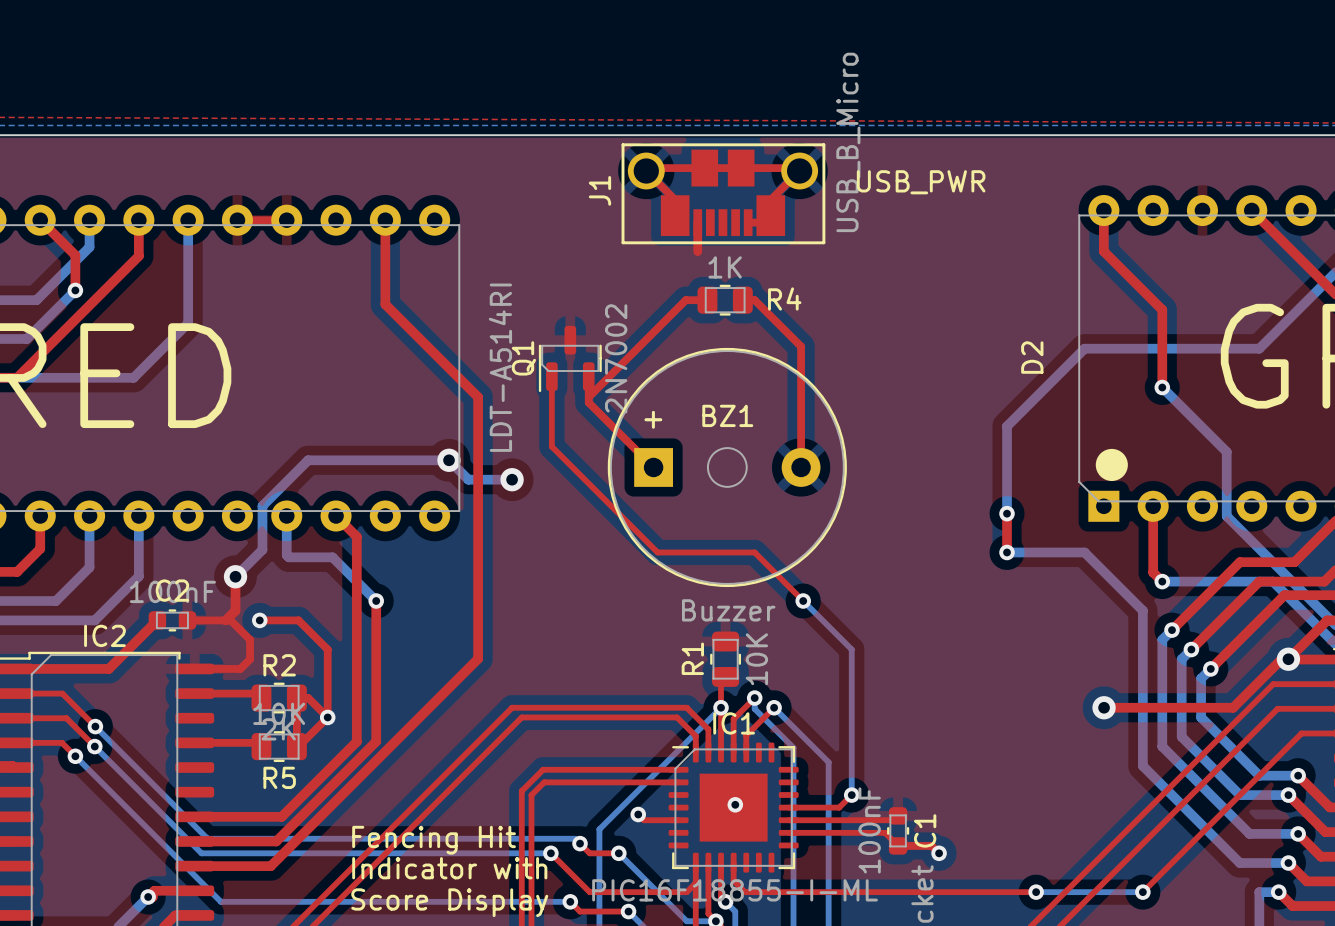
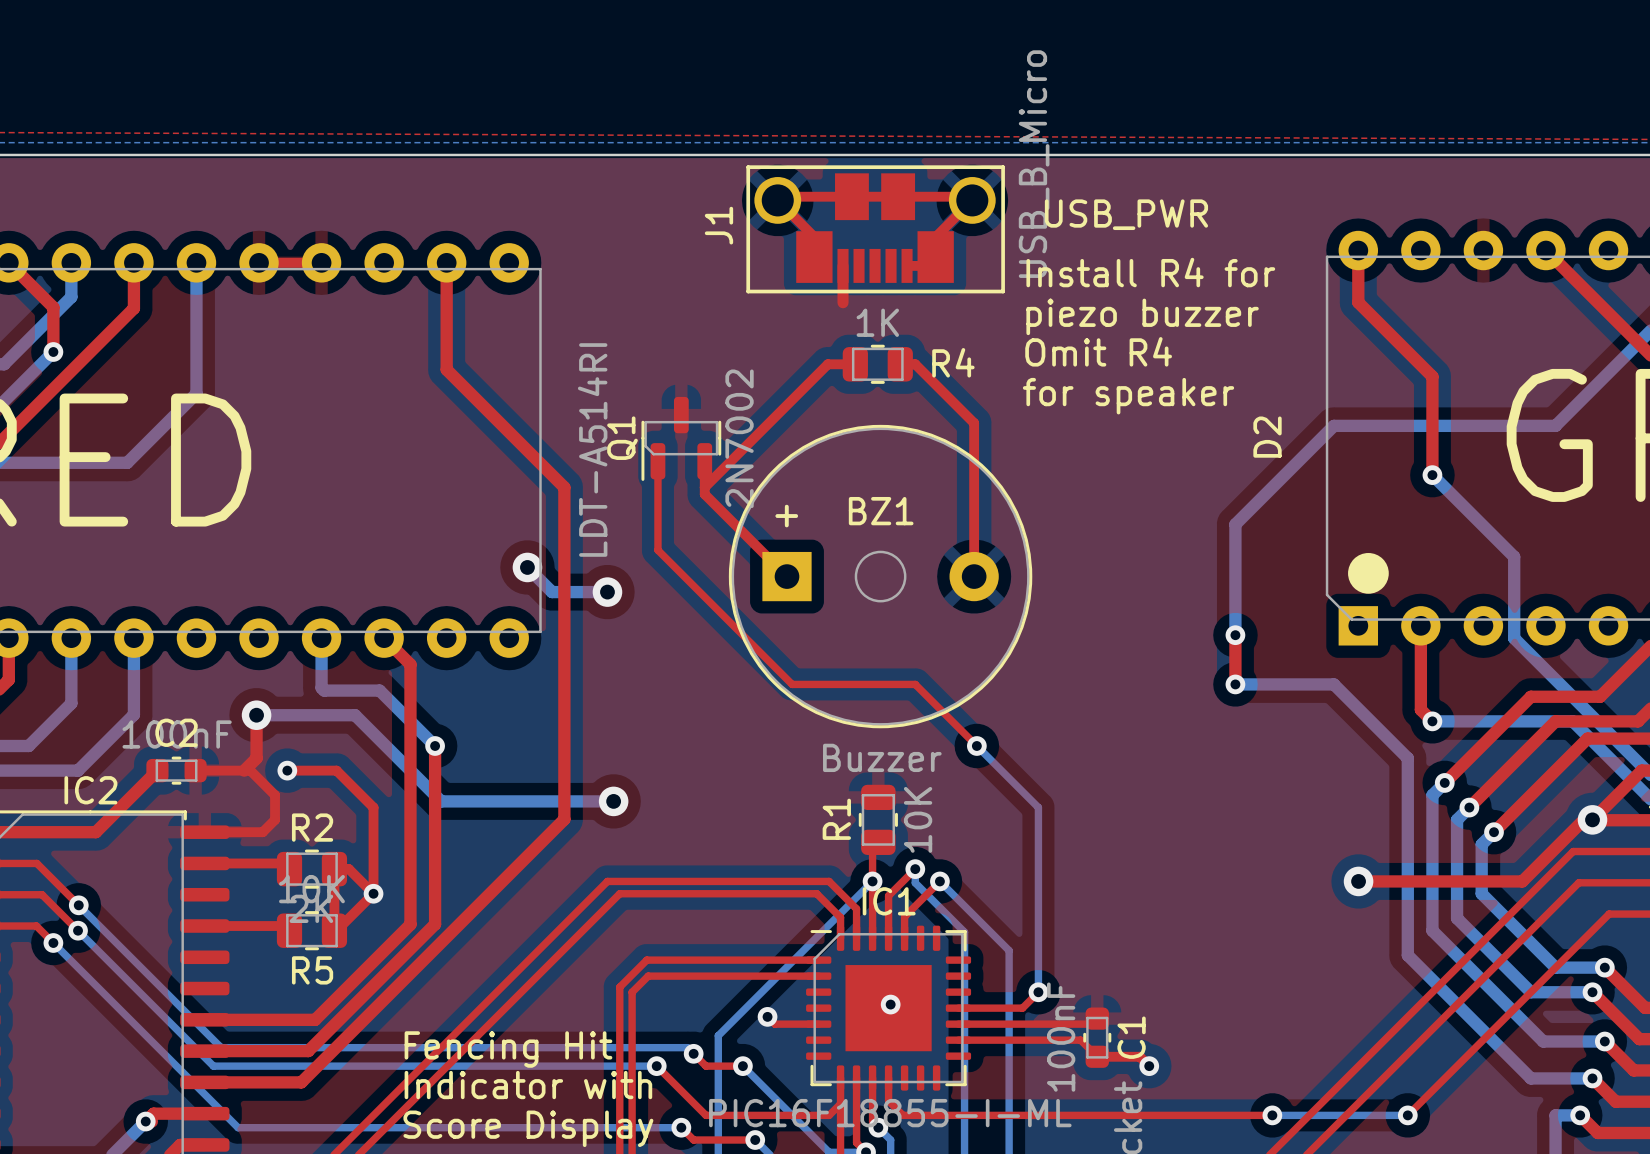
text: none -> Install R4 for (1150, 272)
text: none -> piezo buzzer (1142, 316)
text: none -> Omit R4 (1098, 351)
text: none -> for speaker (1128, 396)
bottom track: (449, 460) (308, 460) (262, 505) (262, 549) (235, 576) -> (613, 801) (441, 801) (355, 715) (256, 715)
via: none -> (613, 801)

